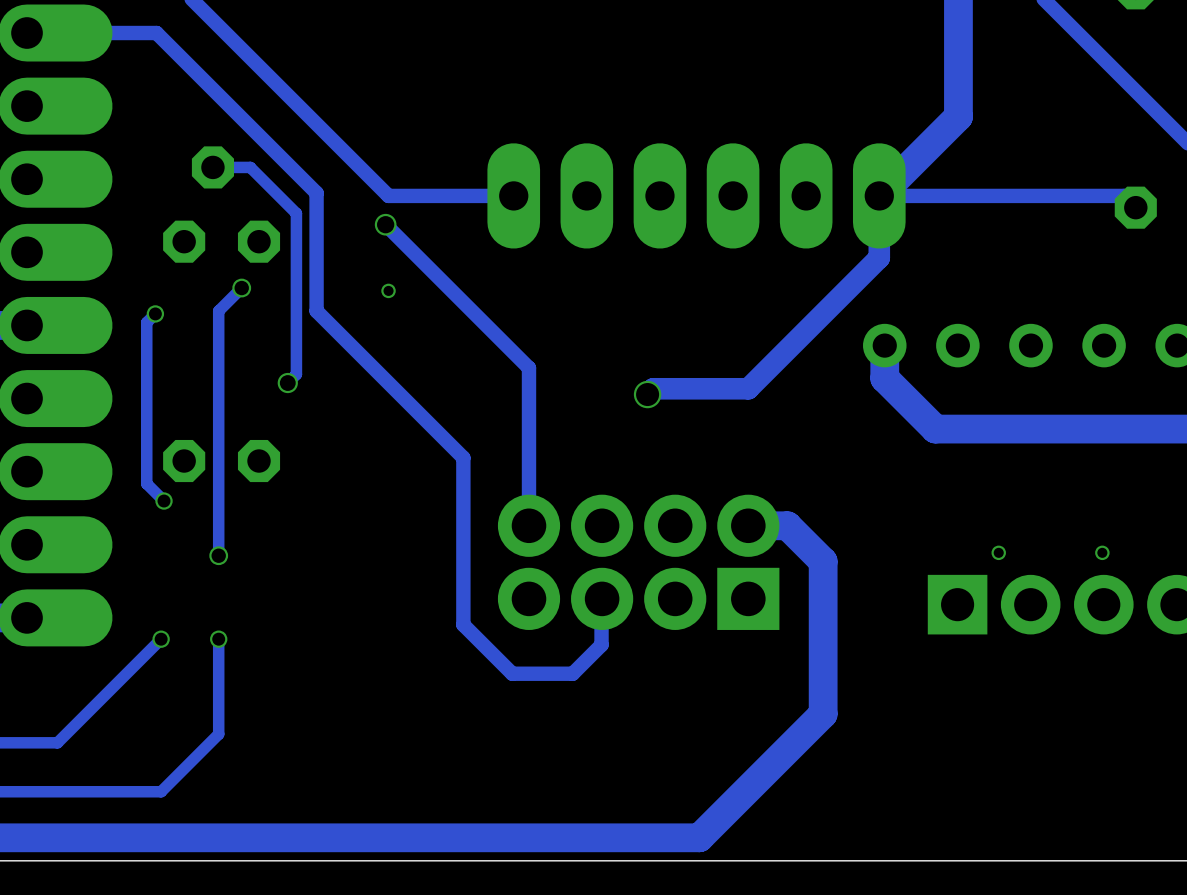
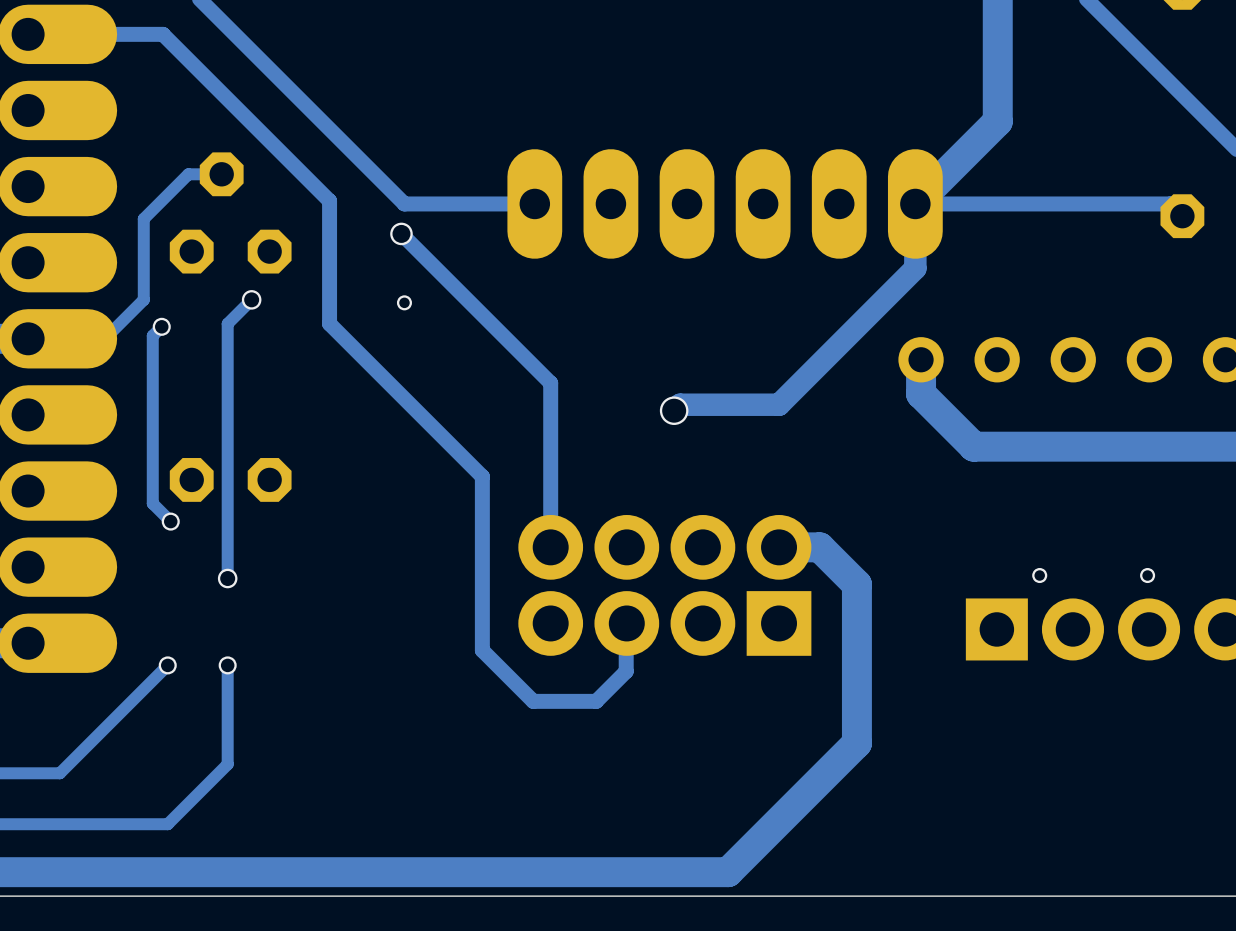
track: (212, 167) (250, 167) (296, 213) (296, 374) (287, 383) -> (221, 174) (188, 174) (143, 218) (143, 299) (104, 338) (28, 338)
via: (287, 383) -> none

